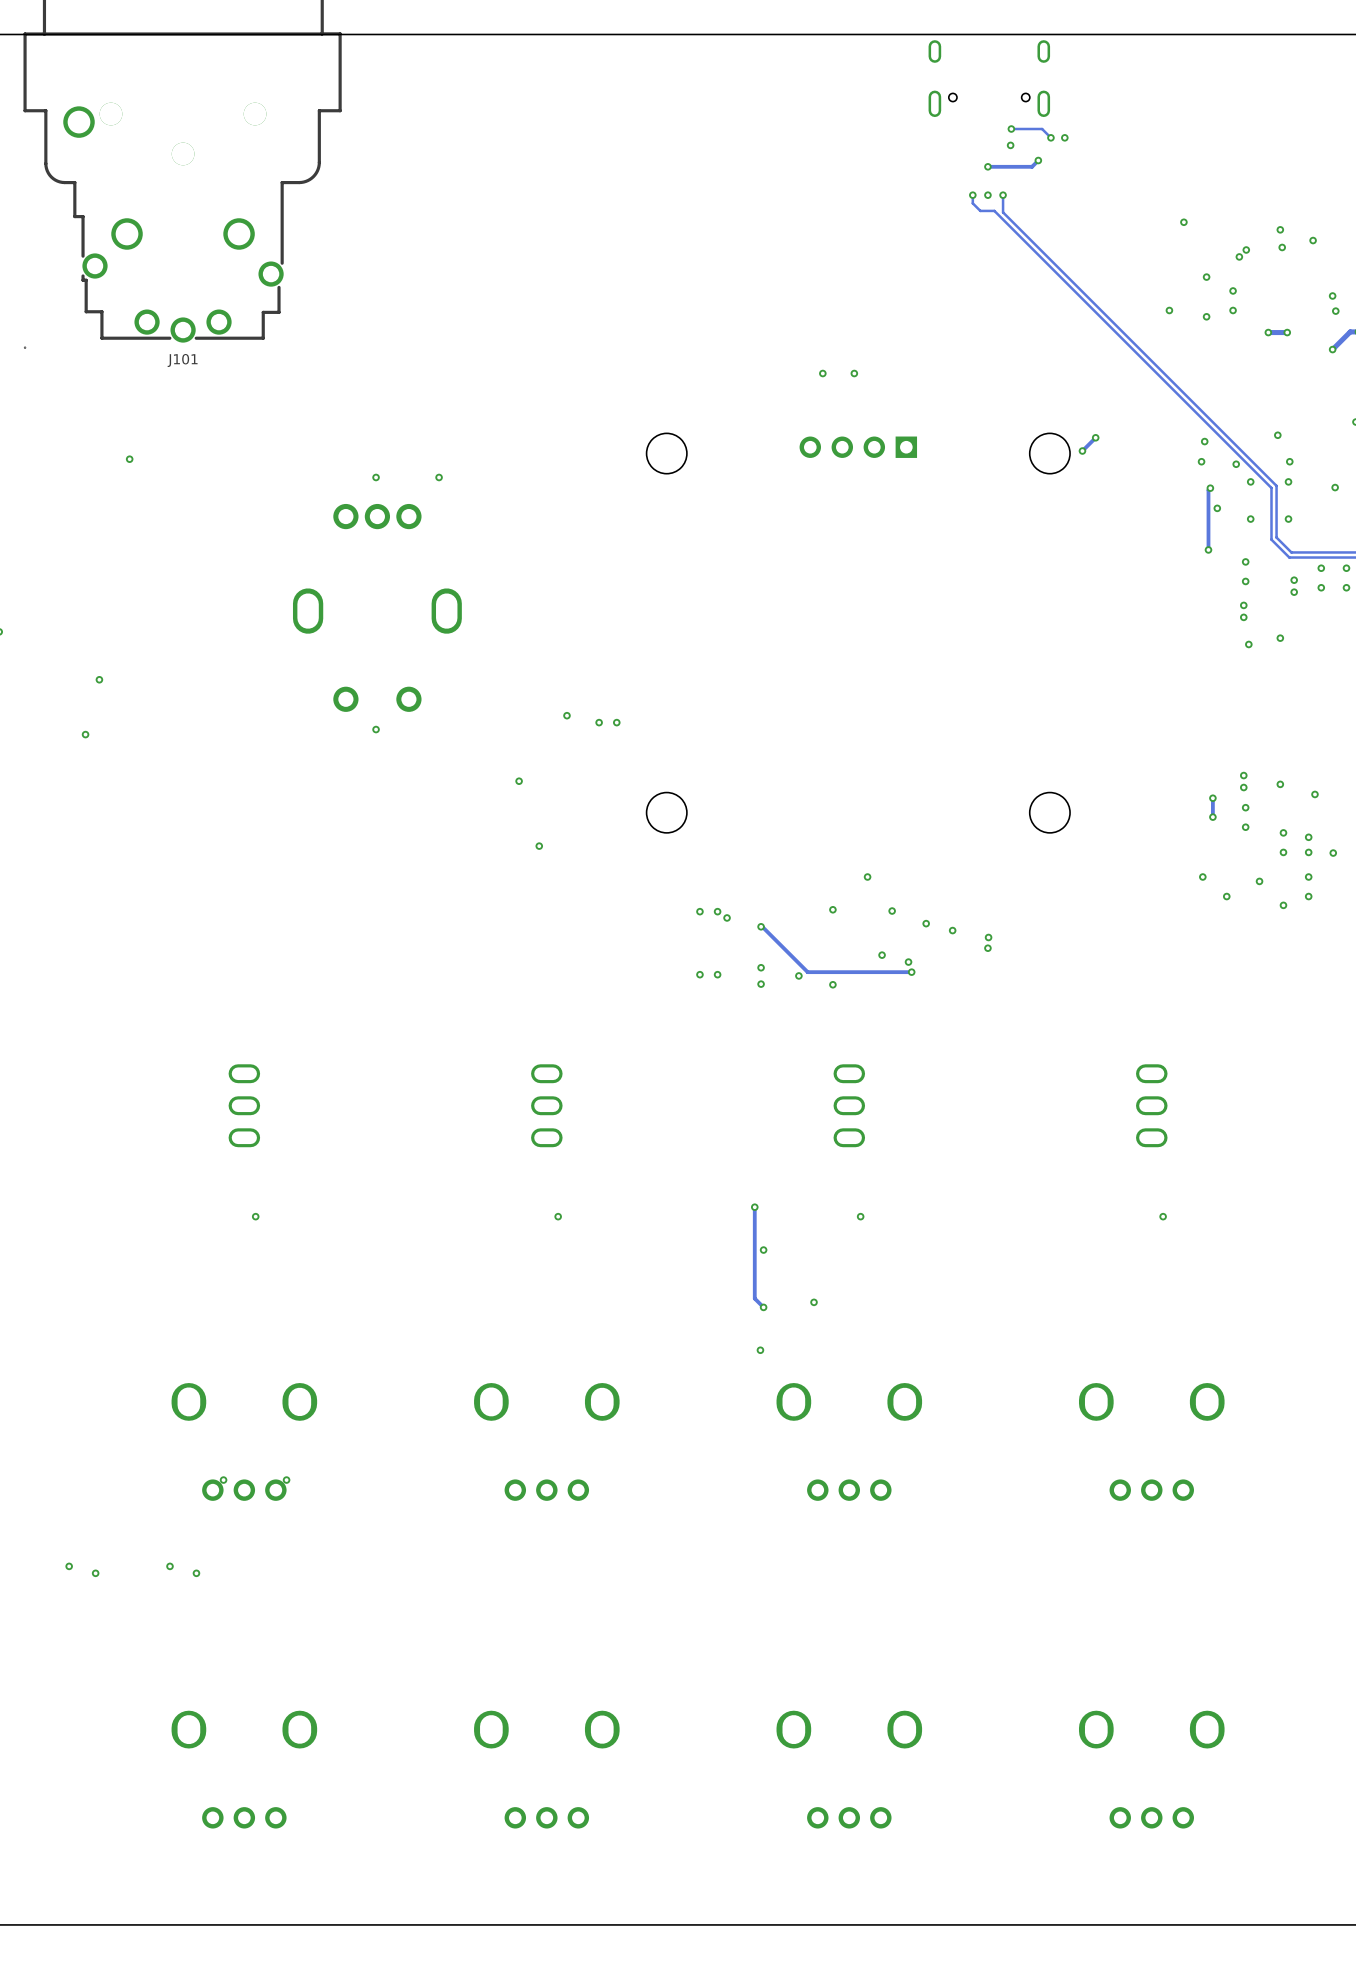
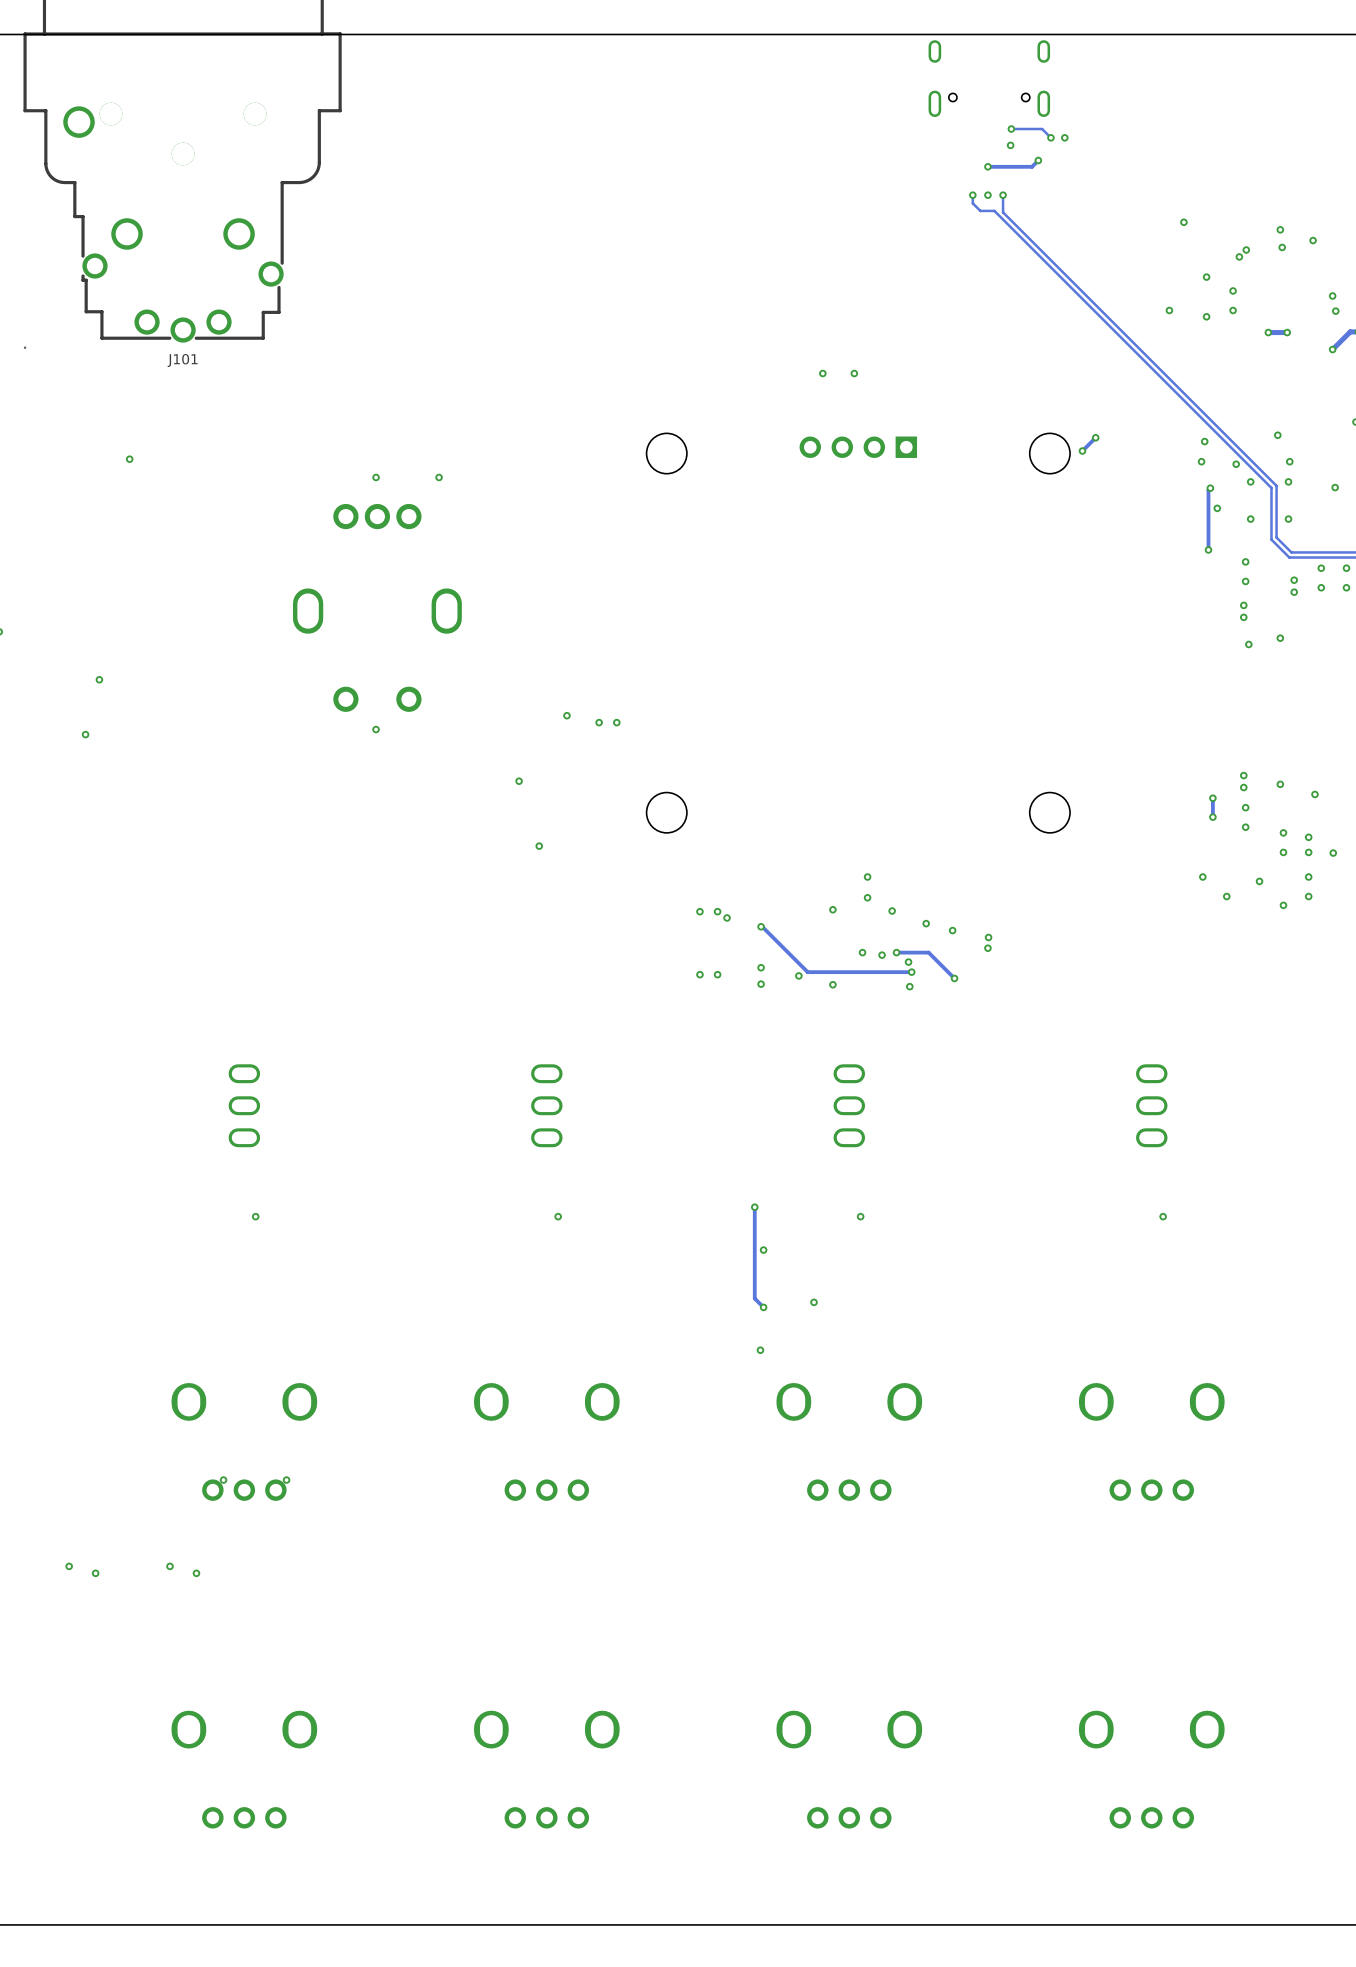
via: none -> (867, 897)
via: none -> (862, 952)
track: none -> (896, 952) (928, 952) (954, 978)
via: none -> (896, 952)
via: none -> (954, 978)
via: none -> (909, 986)

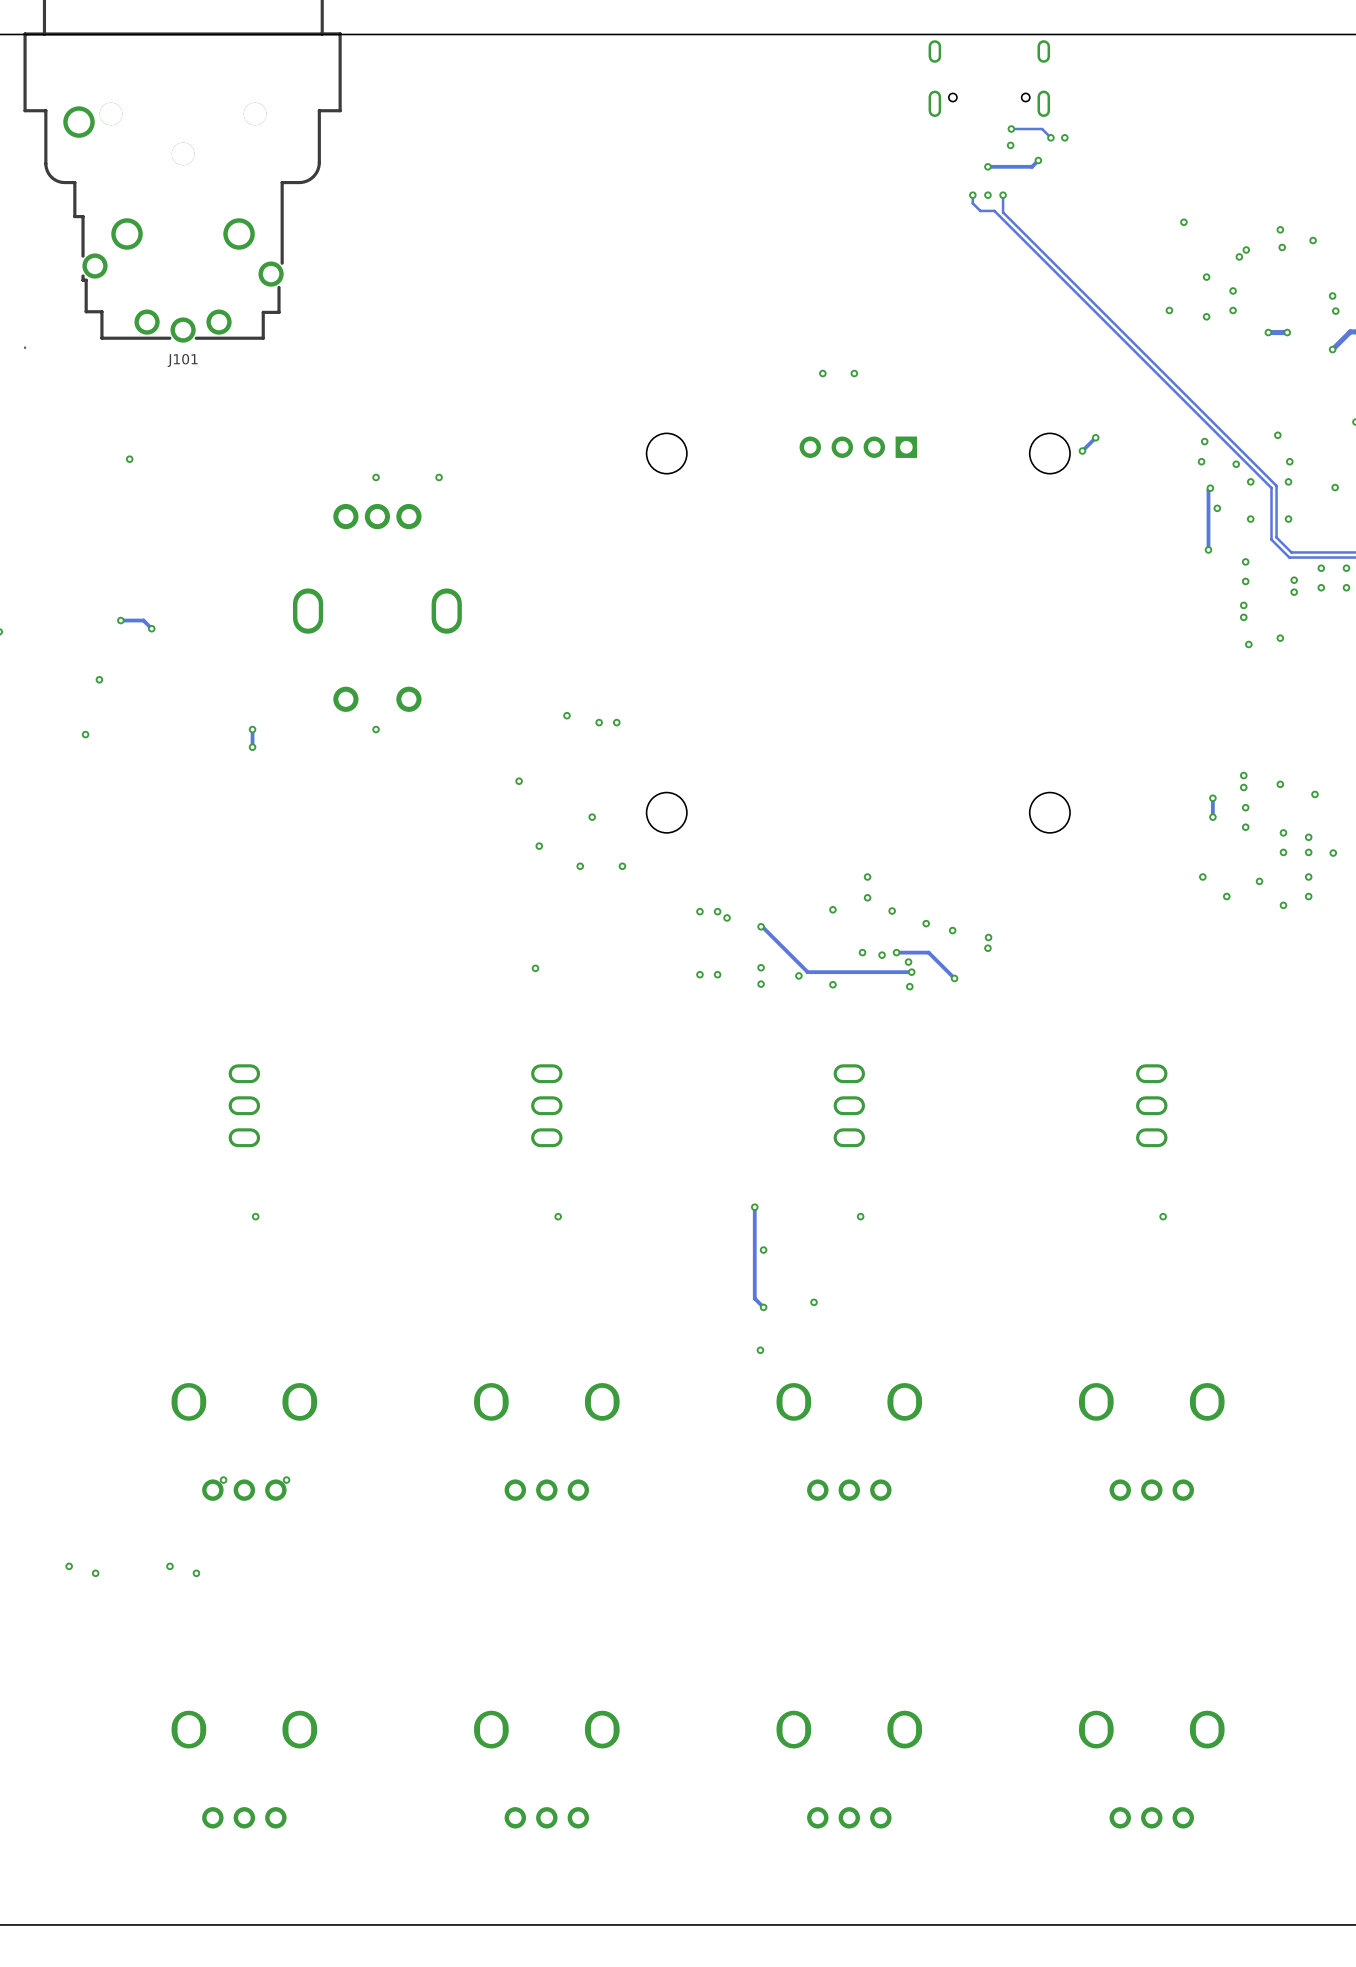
track: none -> (120, 620) (143, 620) (151, 628)
via: none -> (120, 620)
via: none -> (151, 628)
track: none -> (252, 729) (252, 747)
via: none -> (252, 729)
via: none -> (252, 747)
via: none -> (592, 817)
via: none -> (580, 866)
via: none -> (622, 866)
via: none -> (535, 968)

